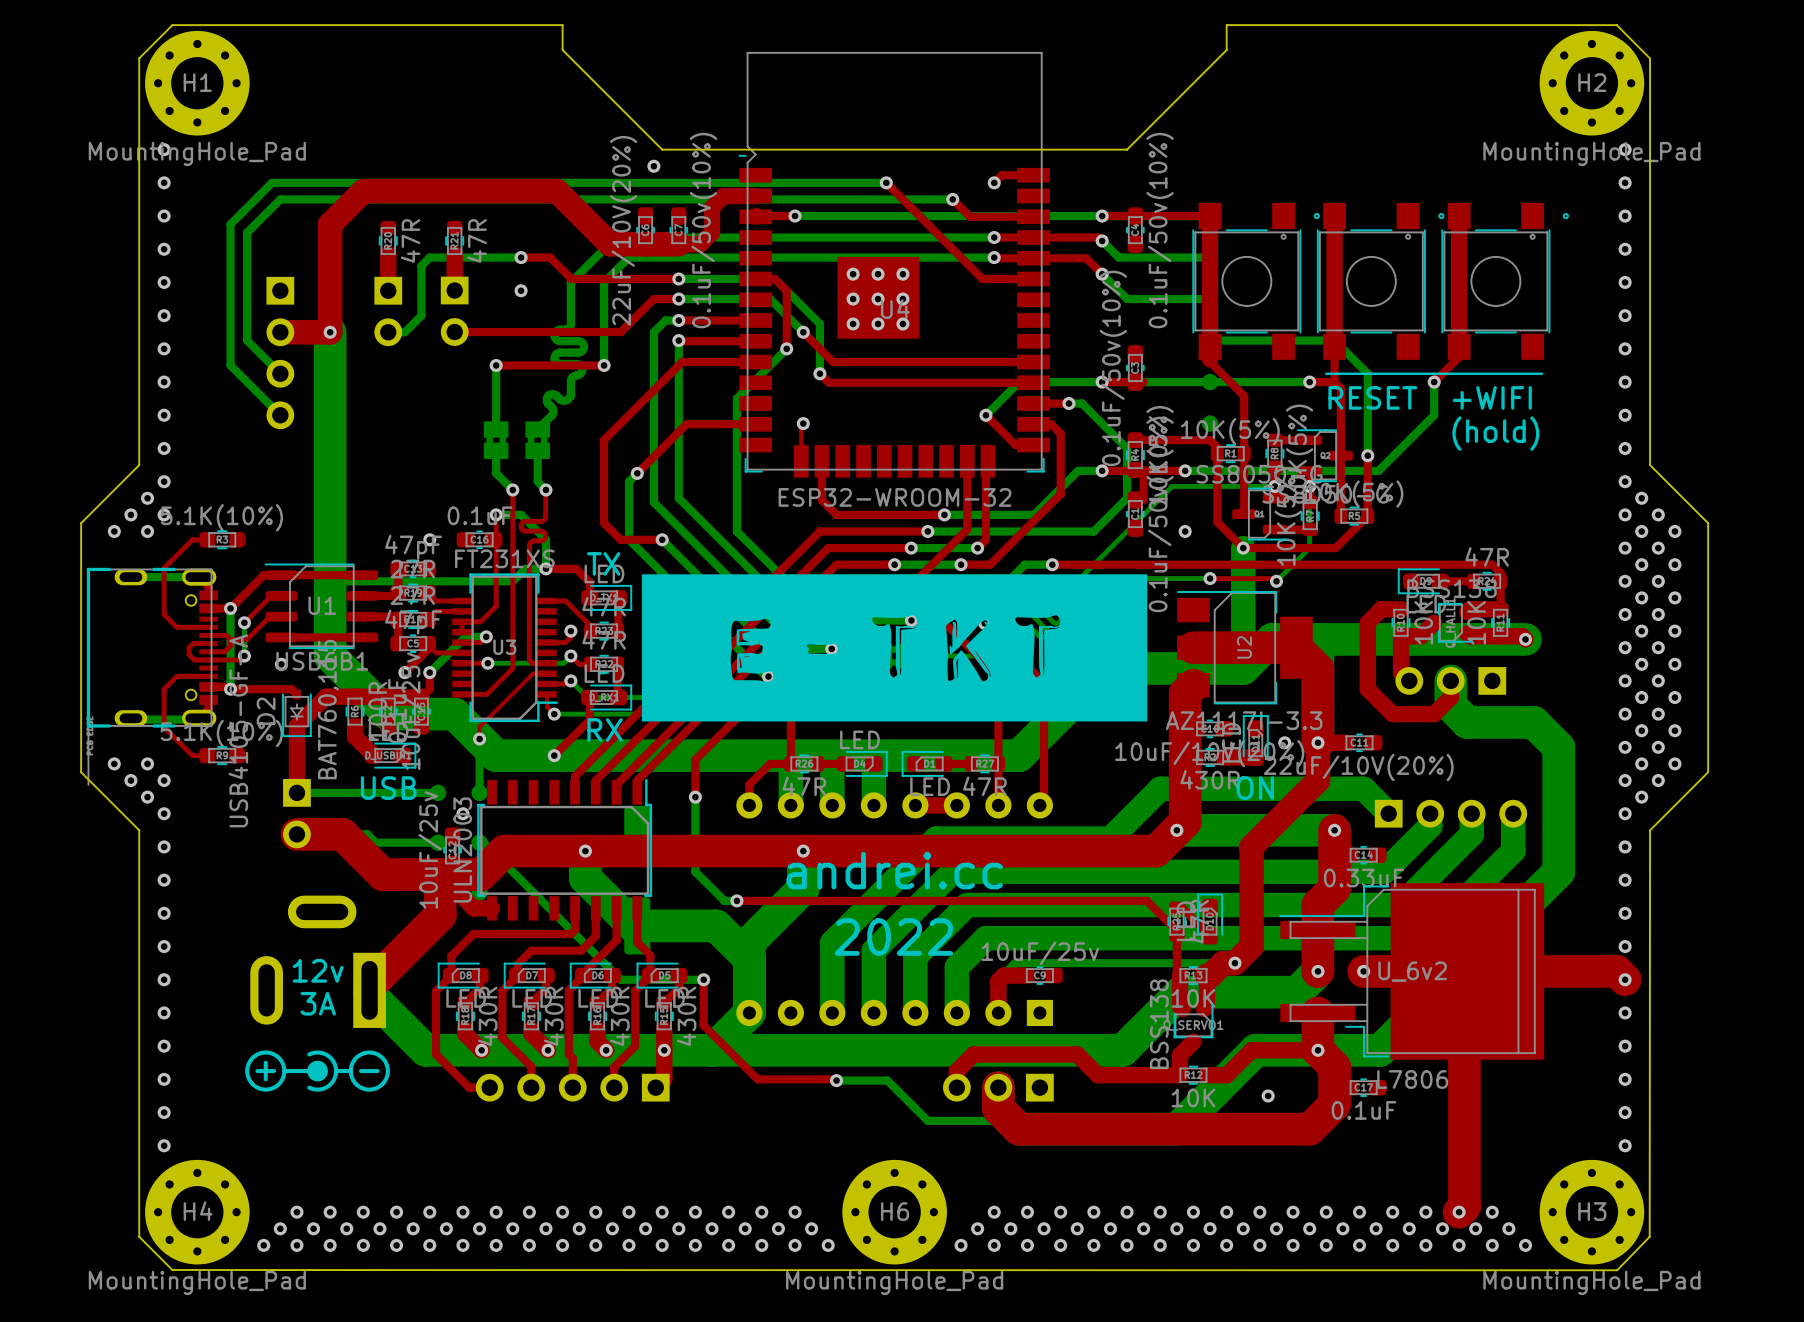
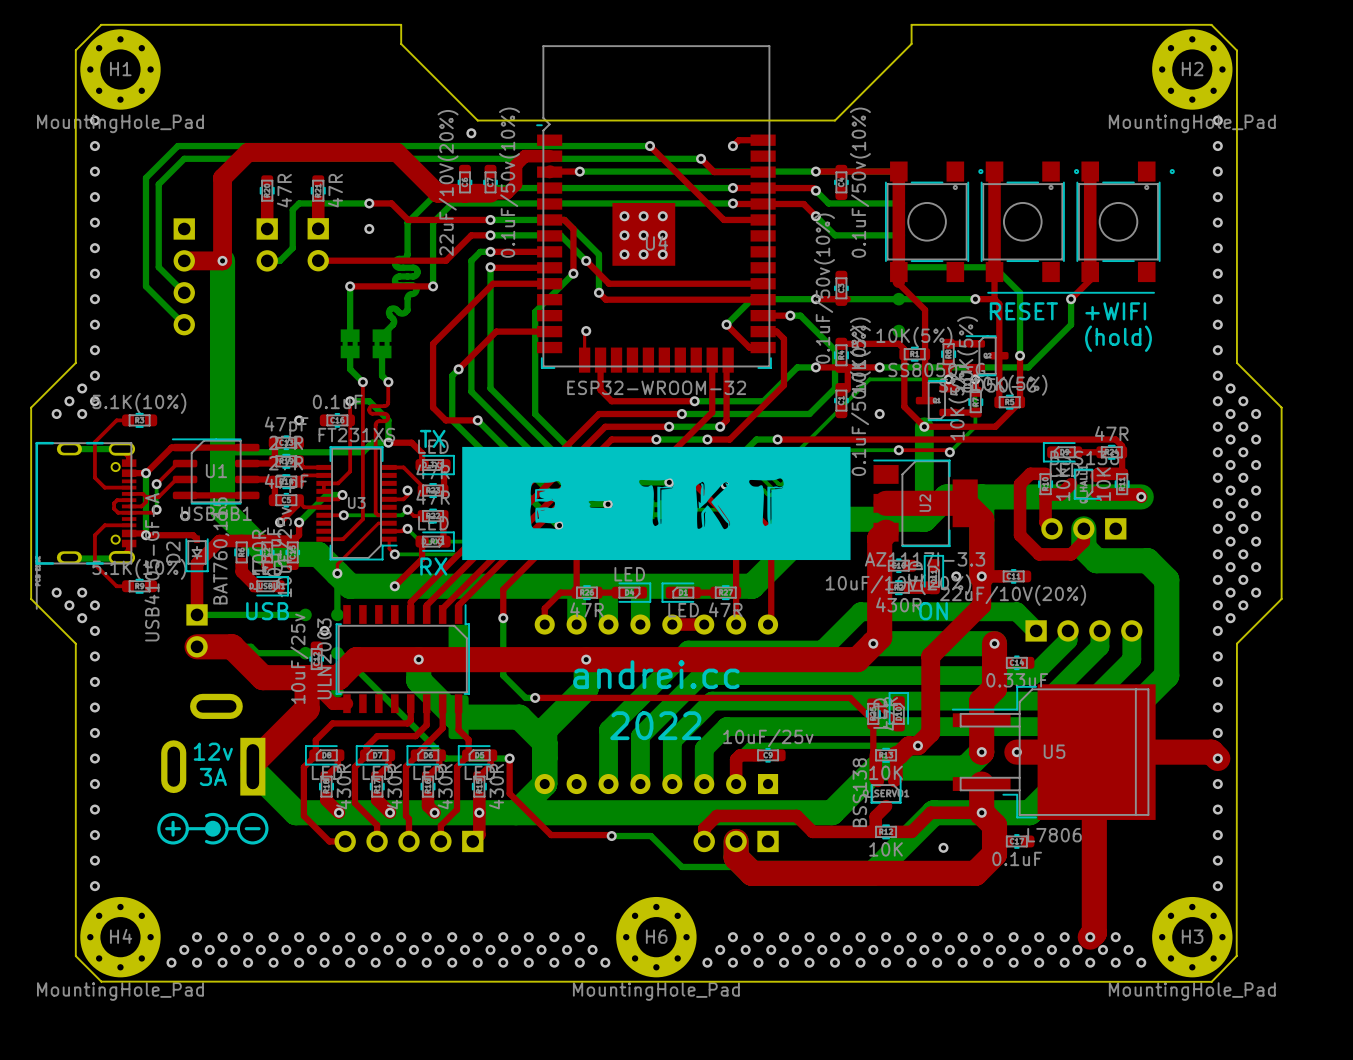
U_6v2 name: U_6v2 (1412, 971) -> U5 (1054, 751)

